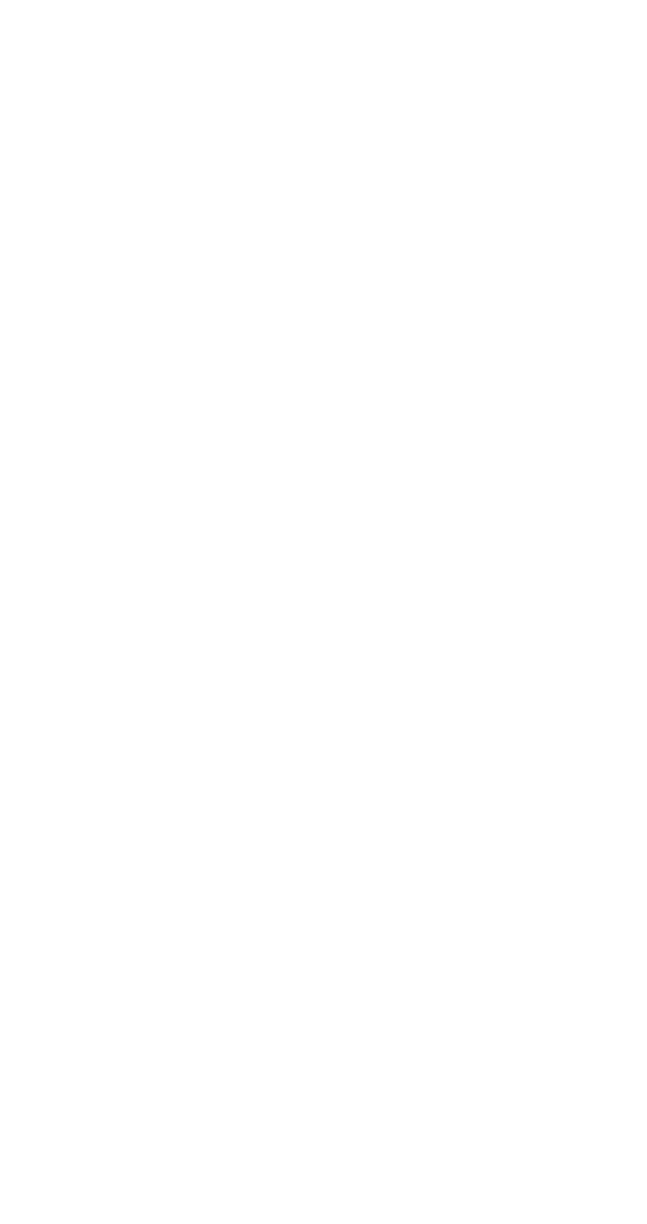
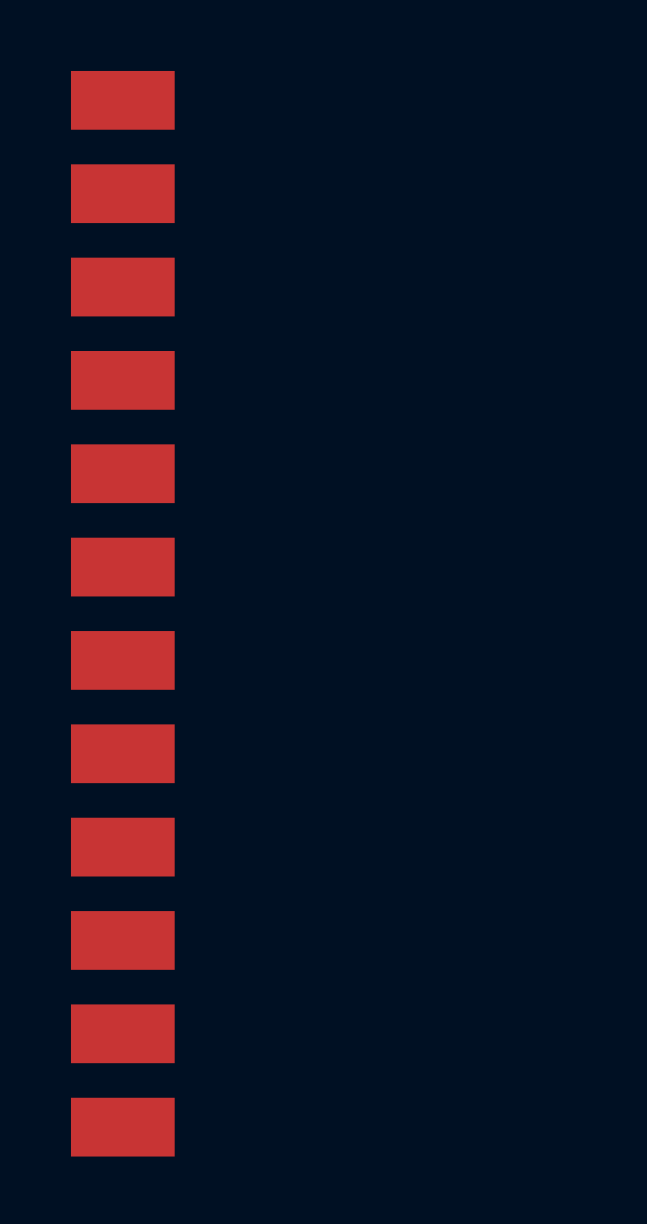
part: none -> (122, 613)

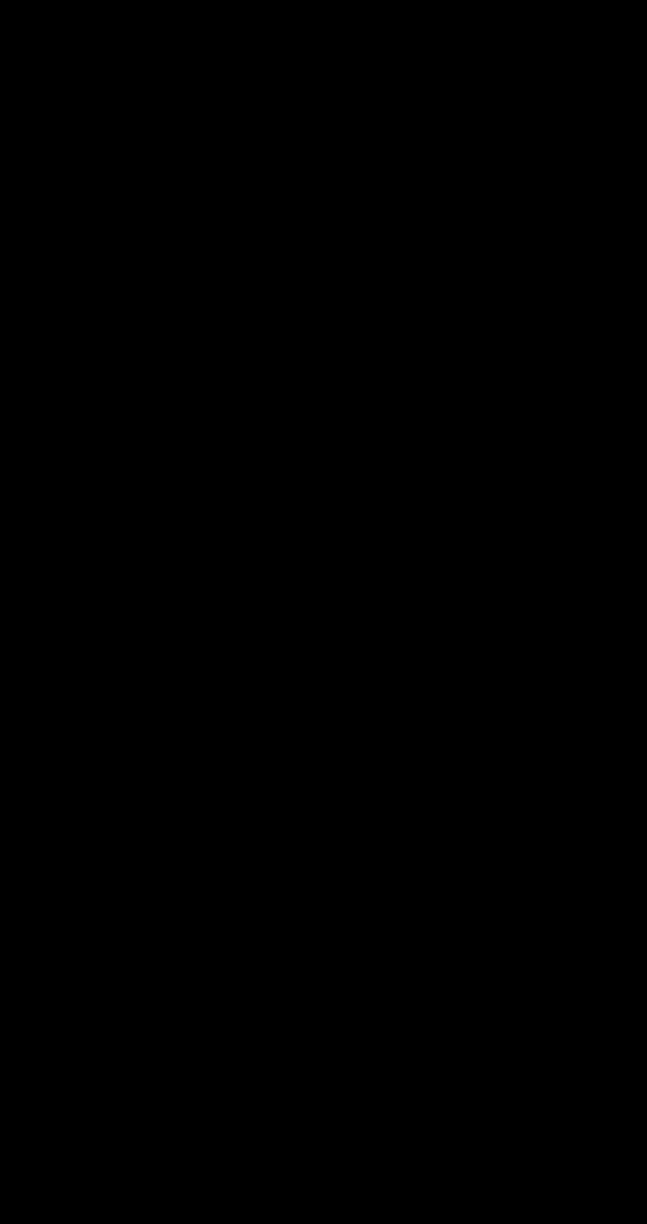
part: (122, 613) -> none

